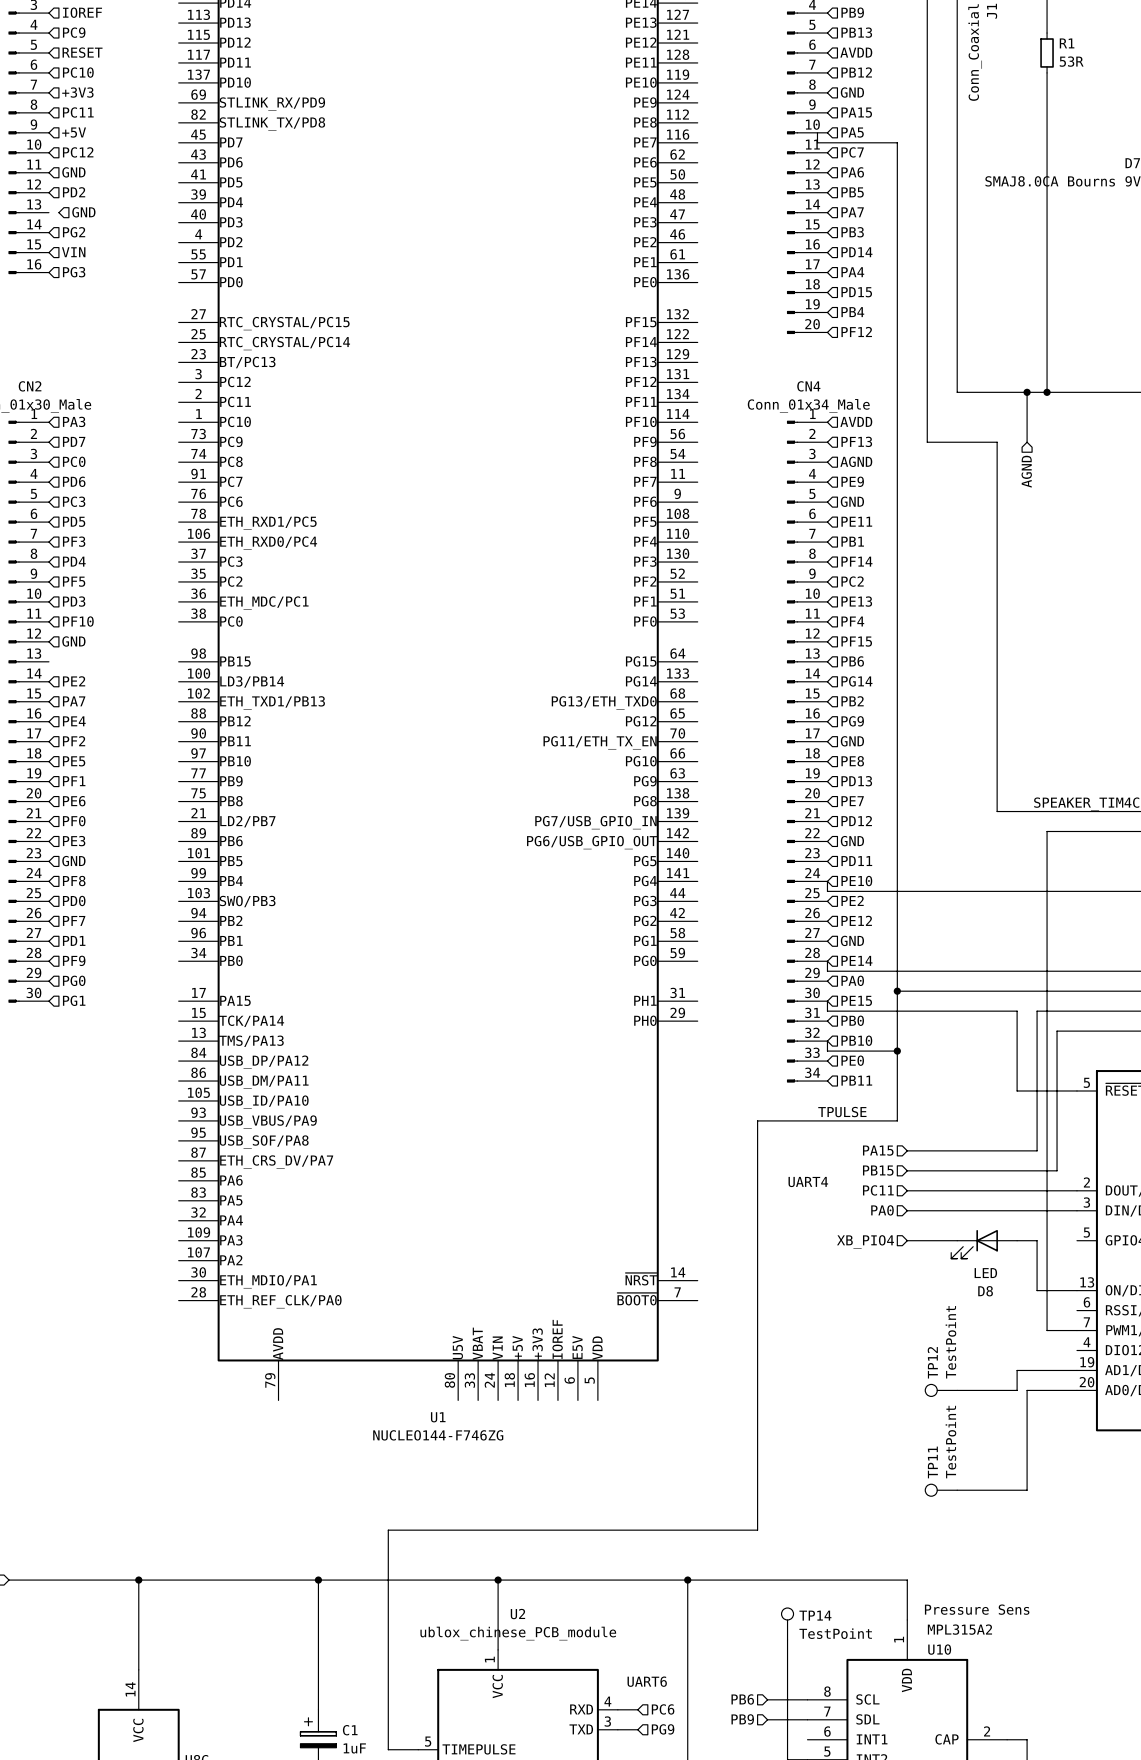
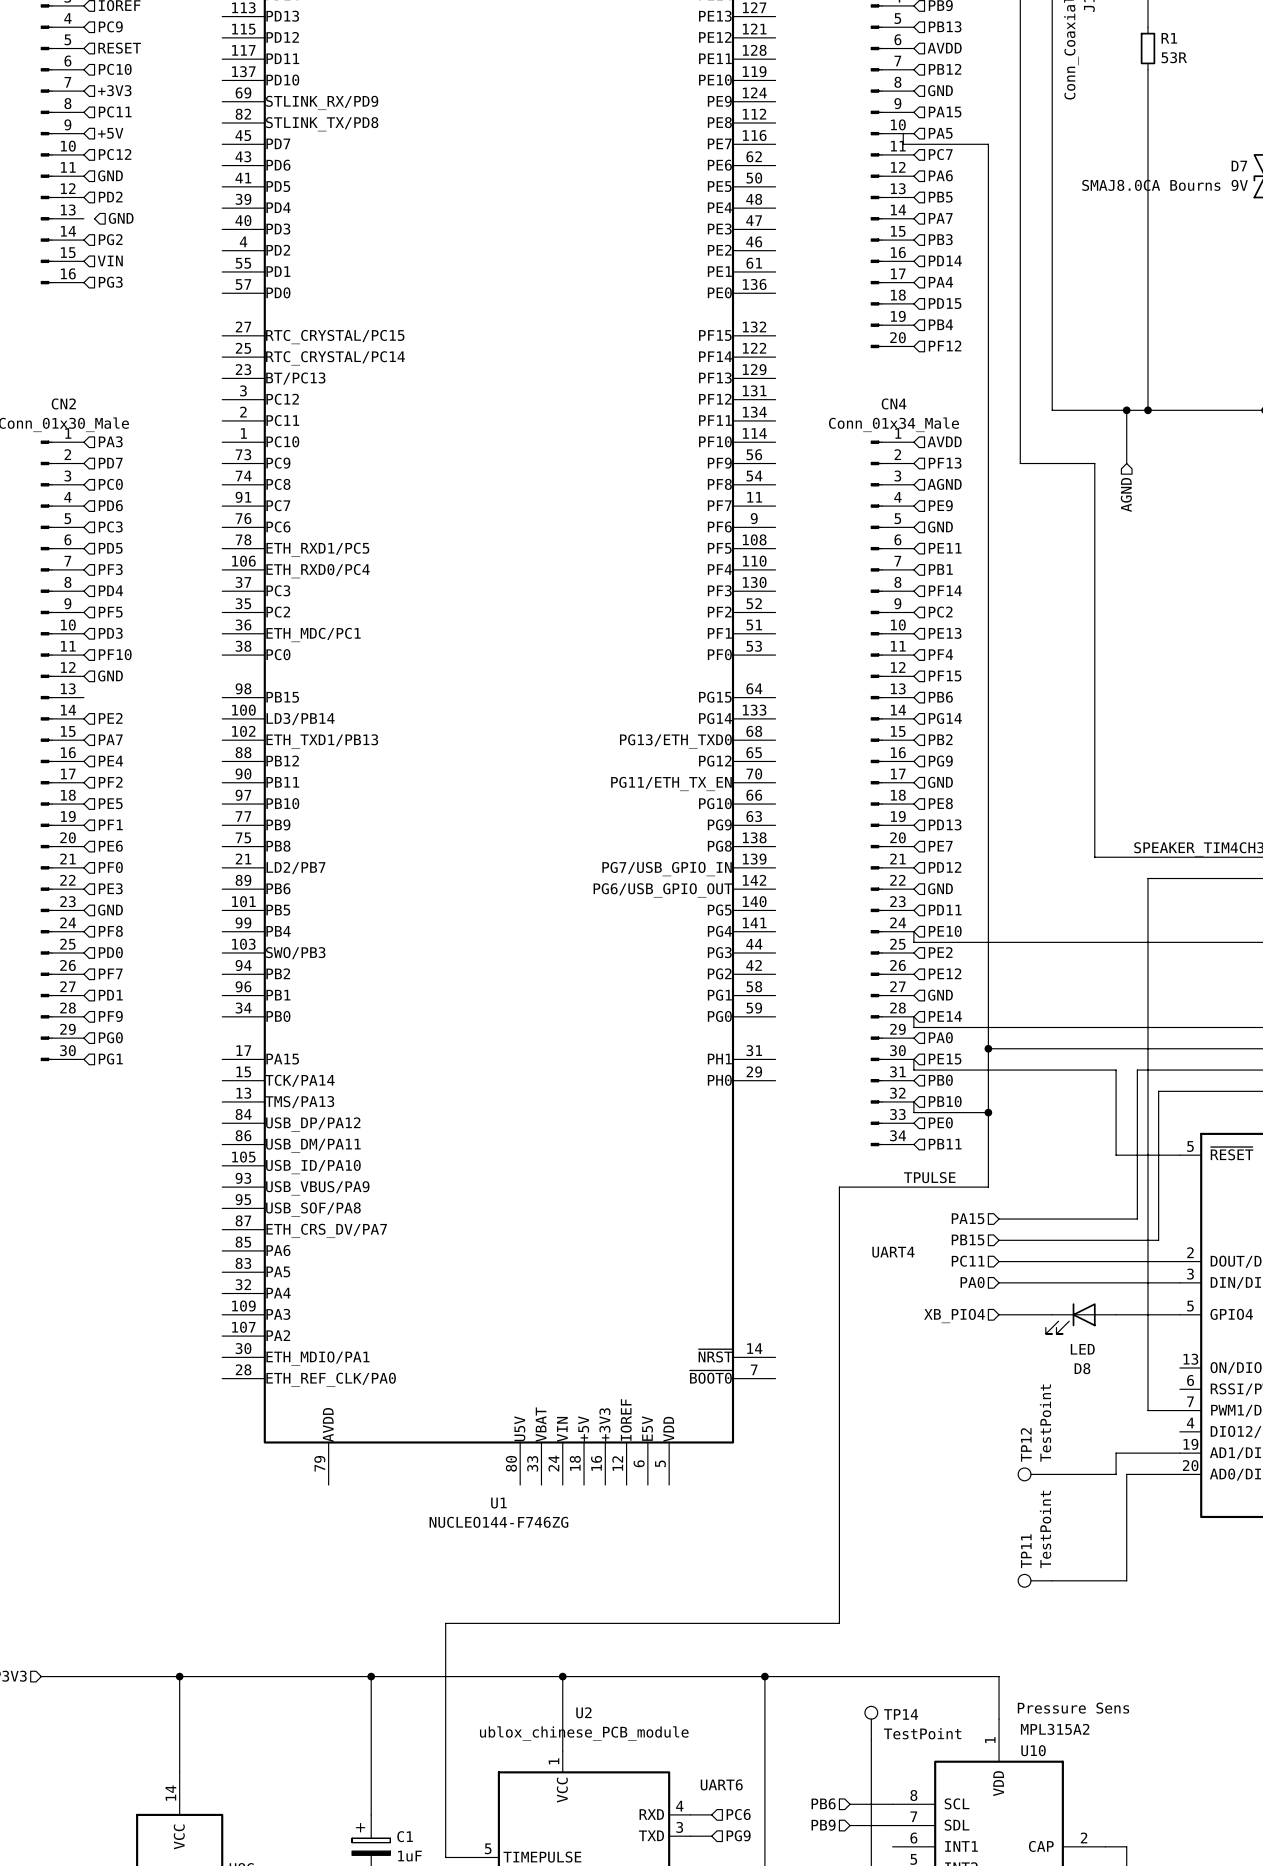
wire: (1037, 1240) (1037, 1290) (1076, 1290) -> (1137, 1314) (1179, 1314)

